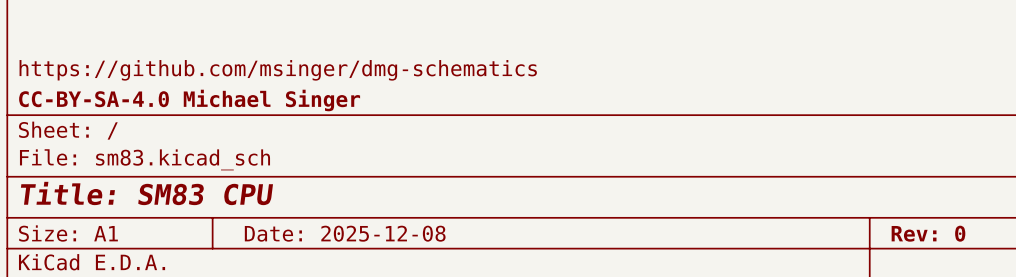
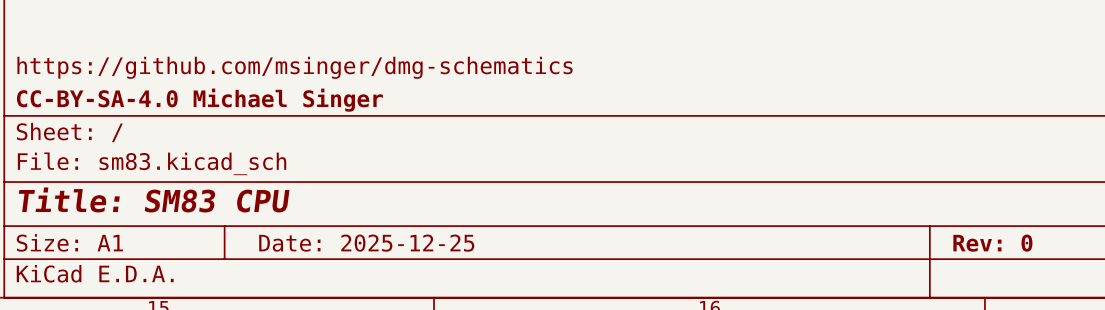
title block: Date: 2025-12-08 (345, 233) -> Date: 2025-12-25 (366, 243)

